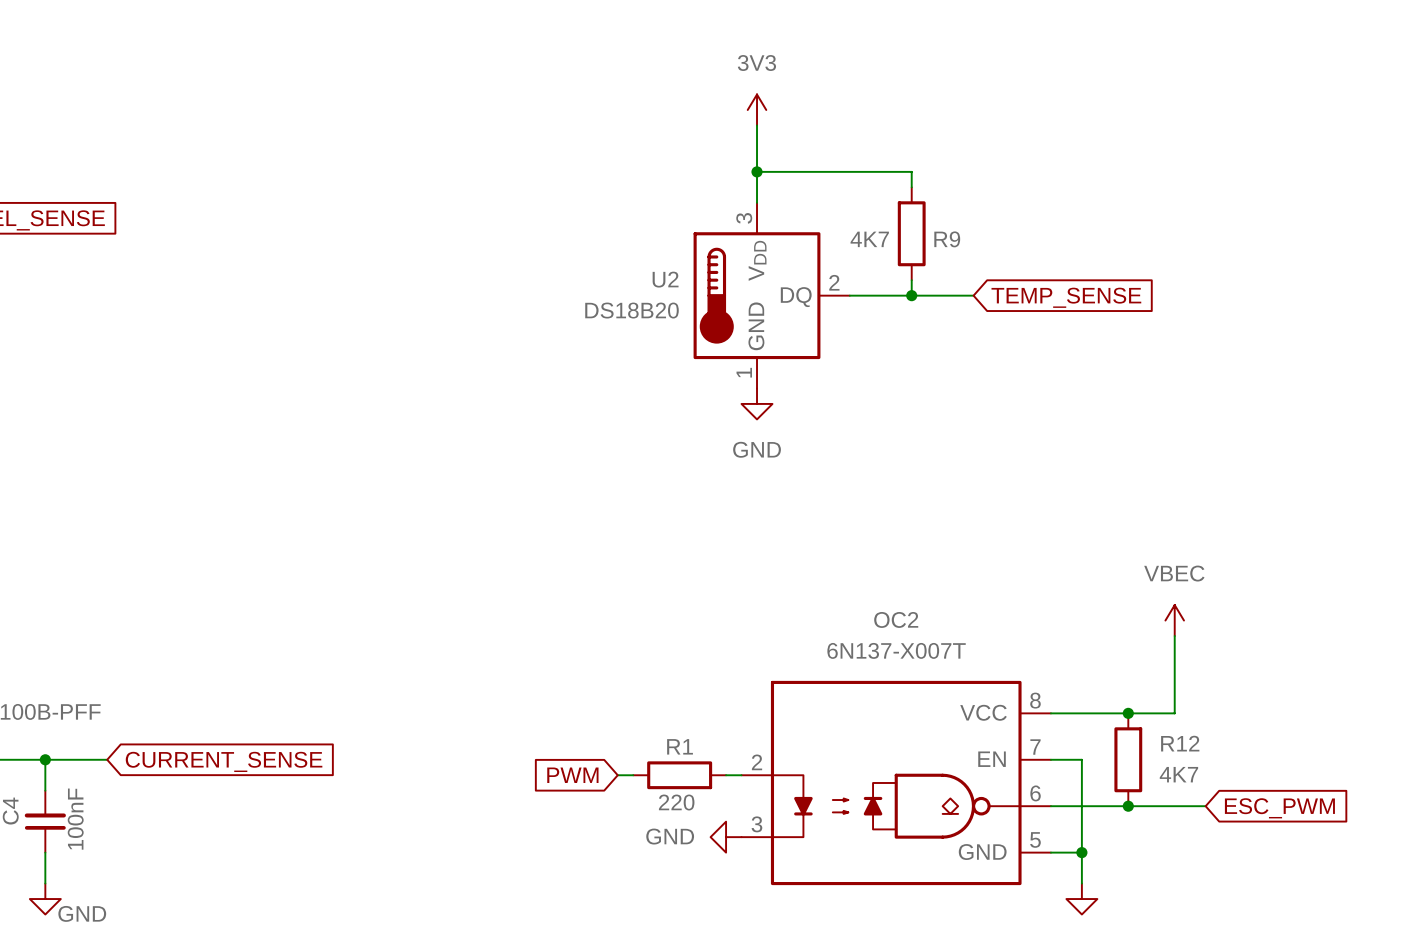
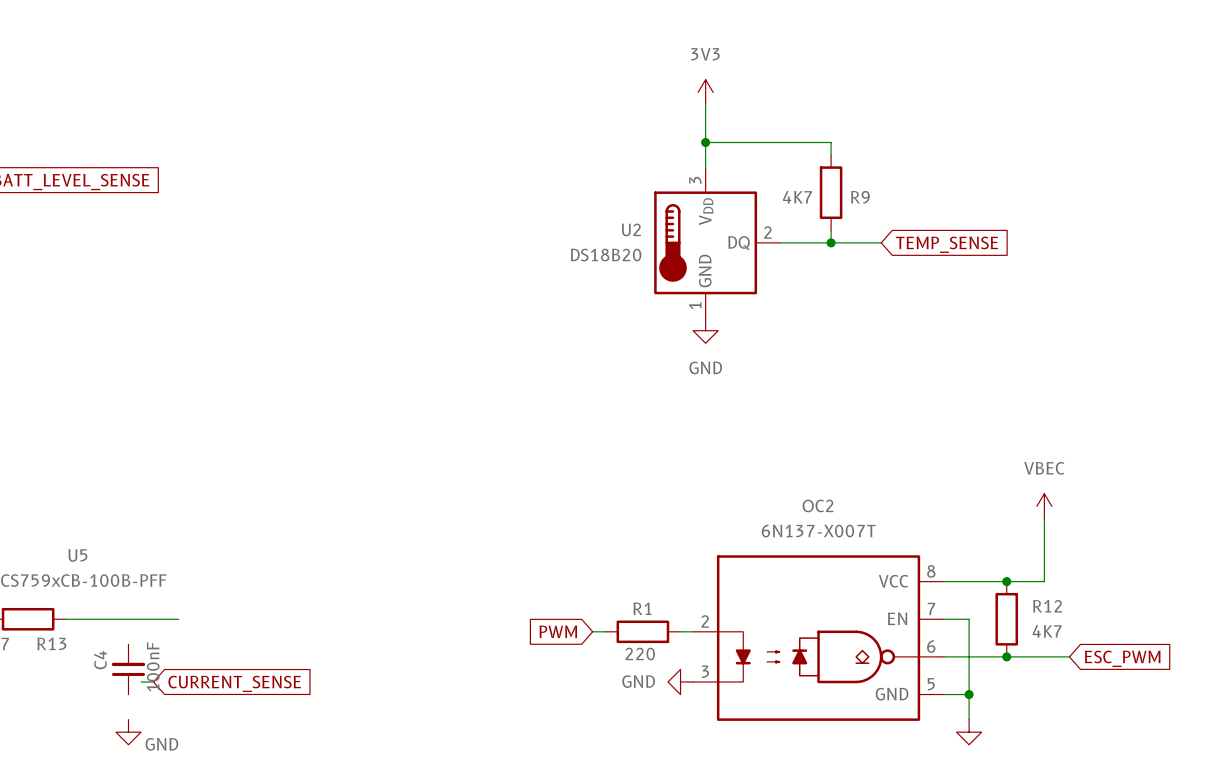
wire: (45, 759) (45, 790) -> none
junction: (45, 759) -> none
global label position: CURRENT_SENSE (224, 761) -> CURRENT_SENSE (234, 683)
wire: none -> (141, 681) (153, 681)
wire: (45, 852) (45, 883) -> none

